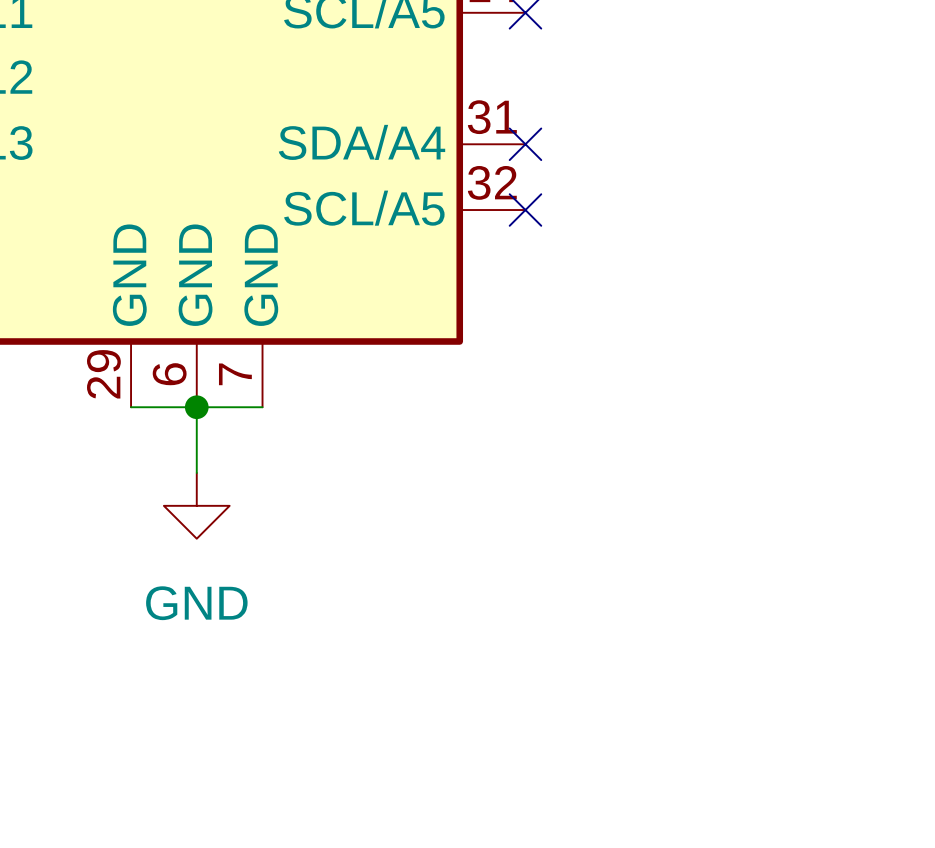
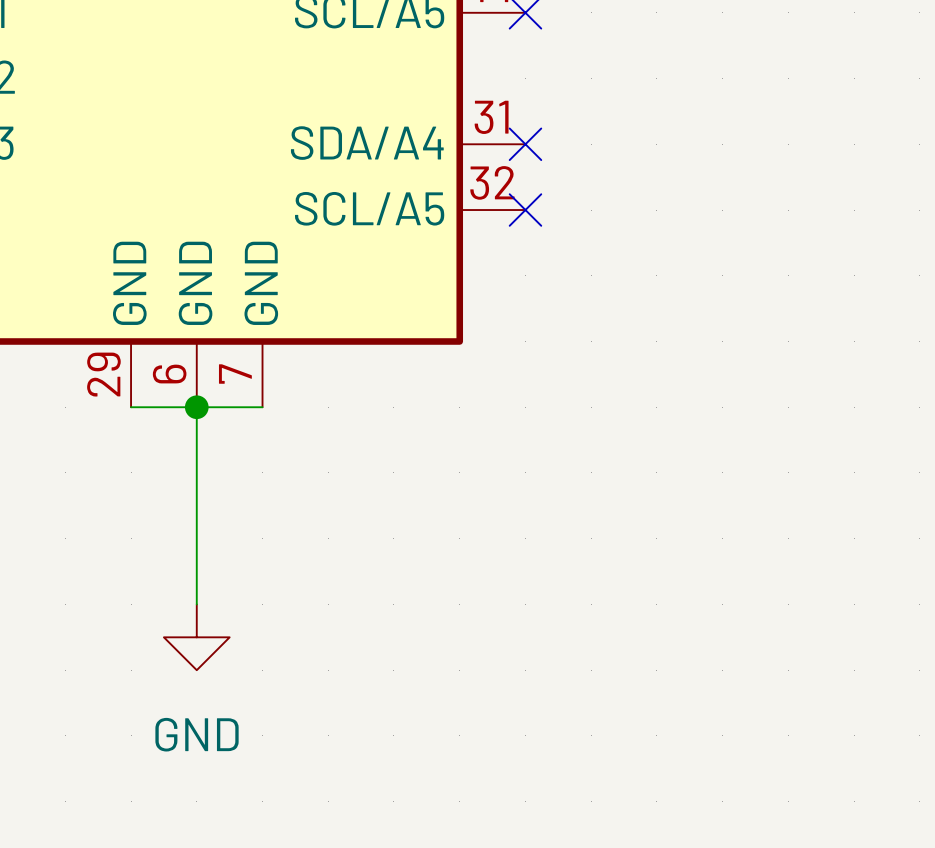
wire: none -> (196, 472) (196, 604)
power symbol position: GND (196, 505) -> GND (196, 637)

